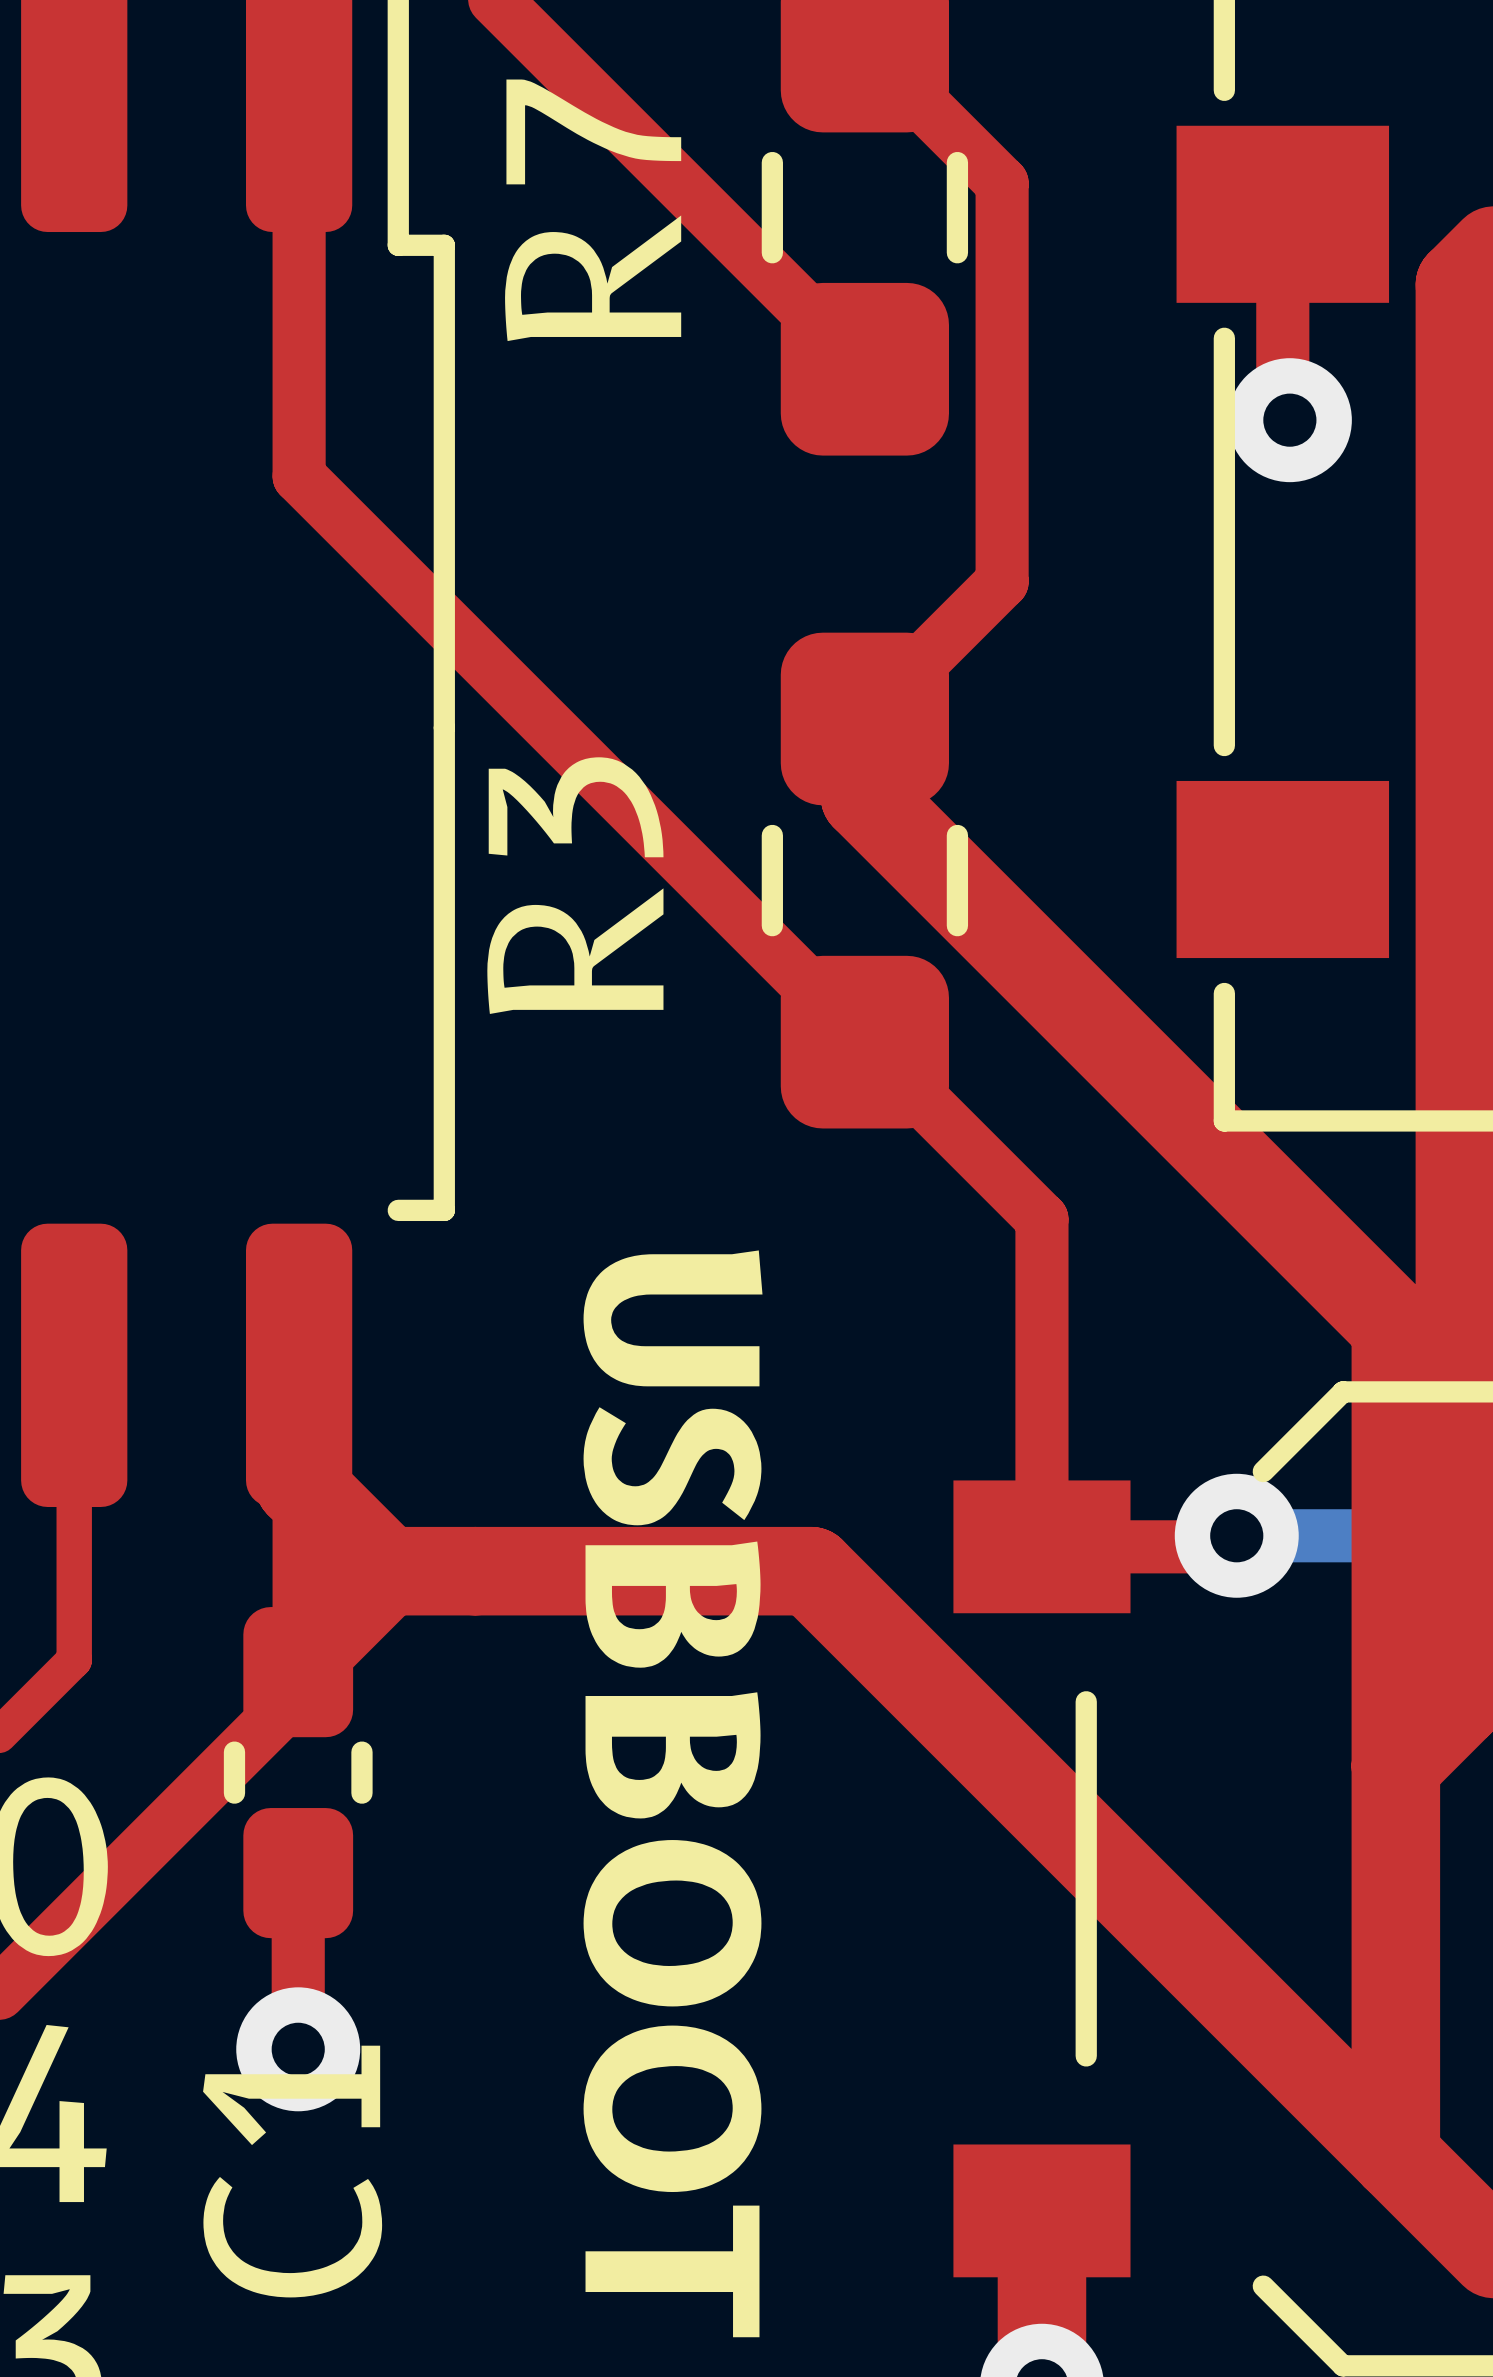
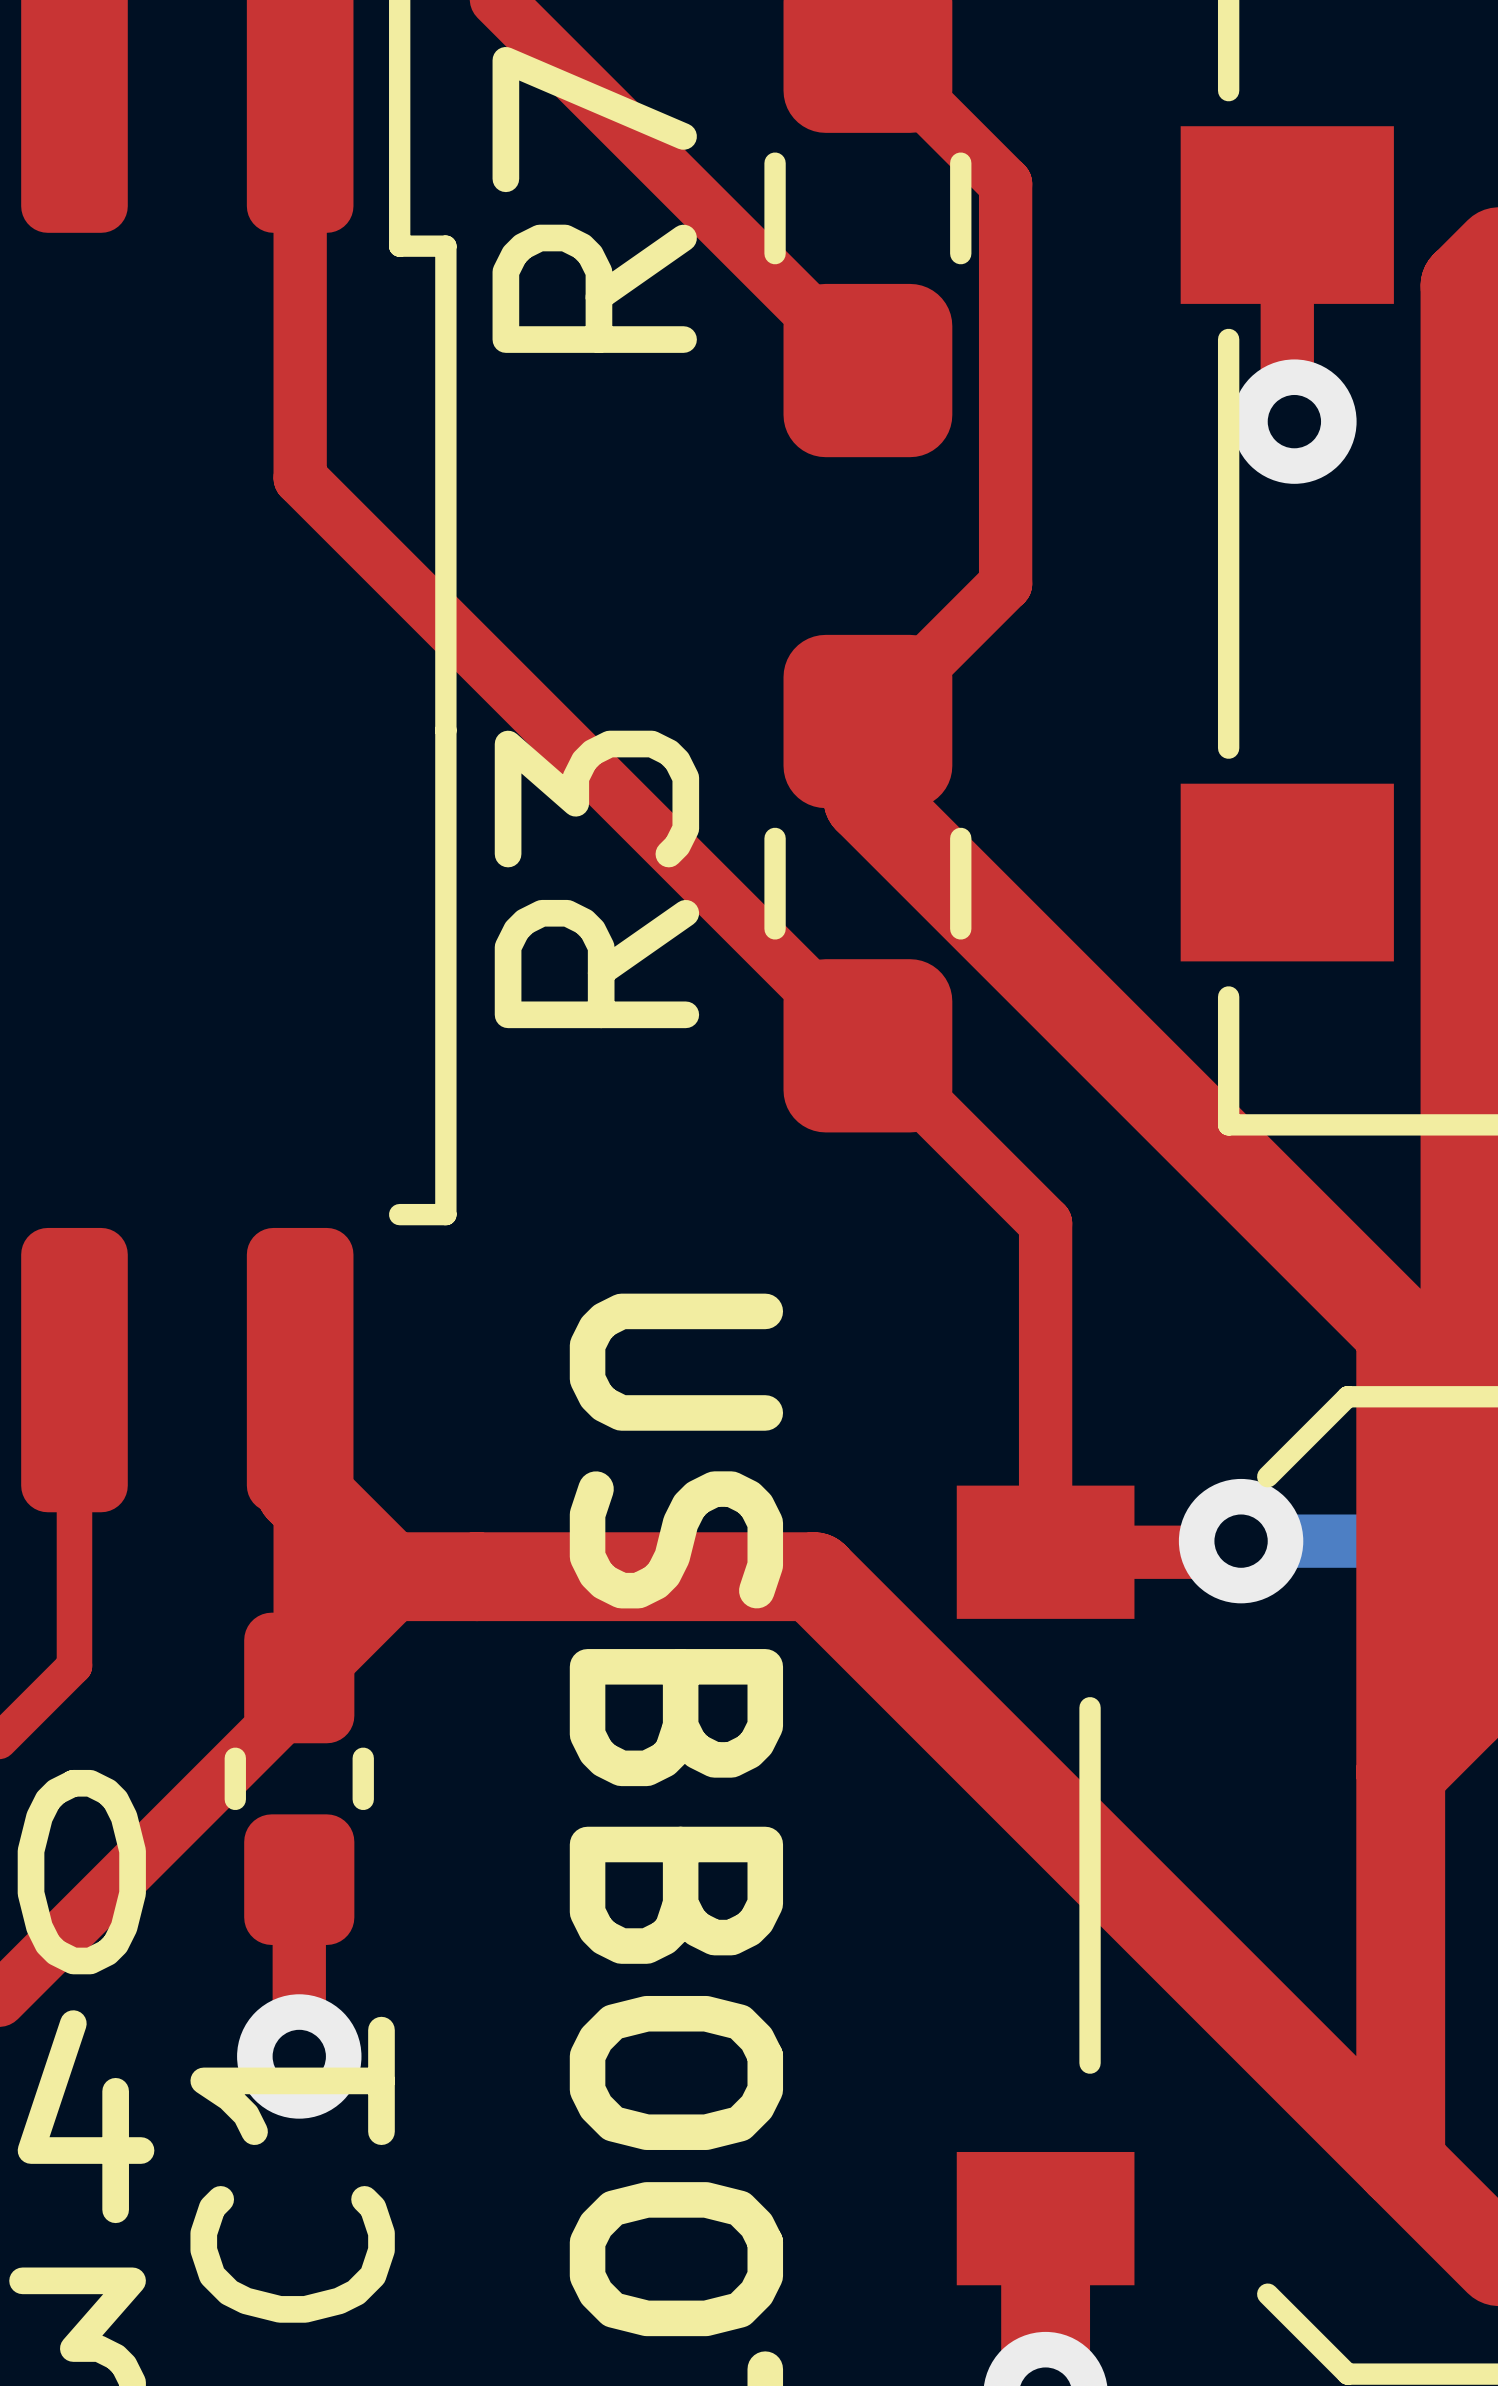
R3 name position: R3 (575, 885) -> R3 (596, 879)

